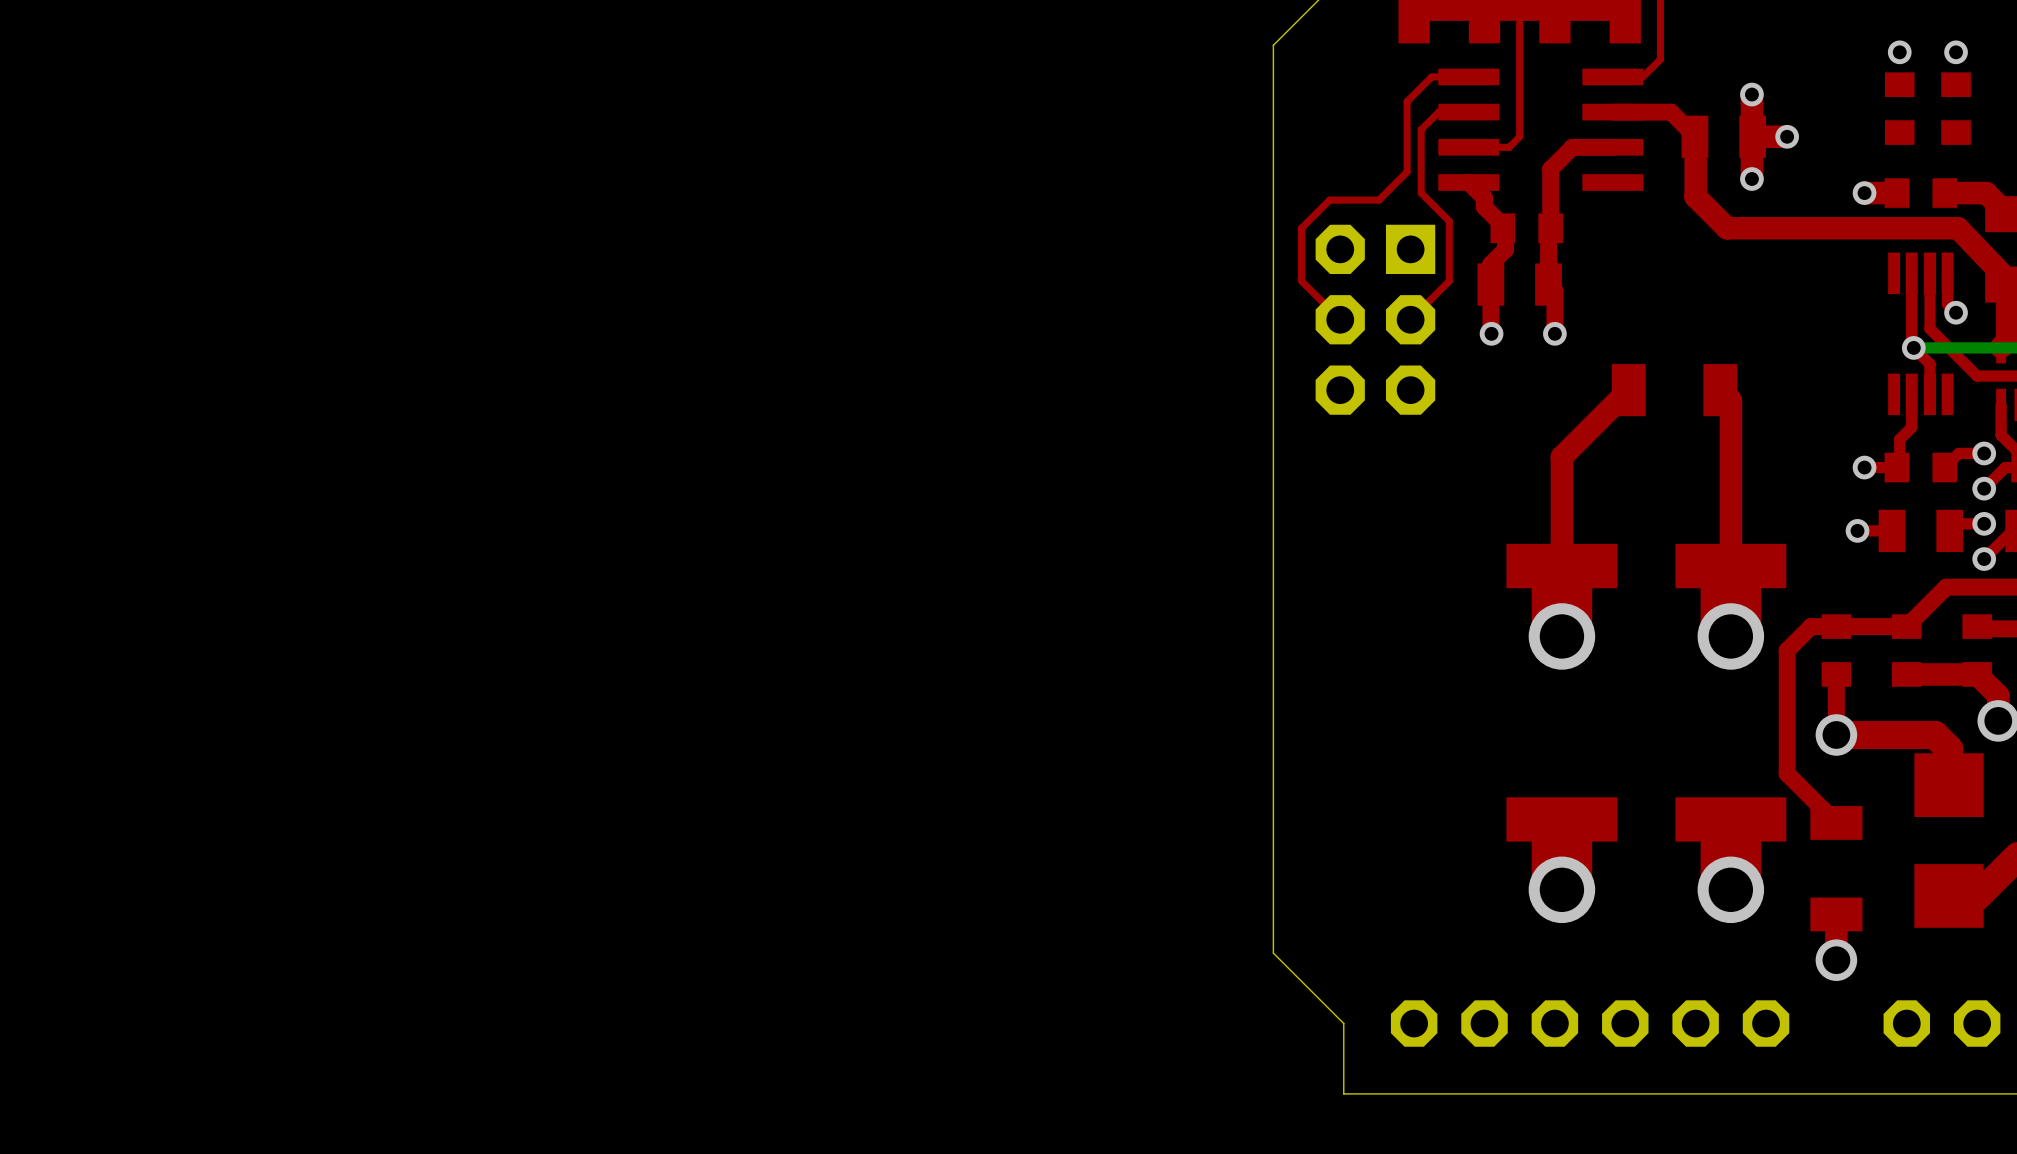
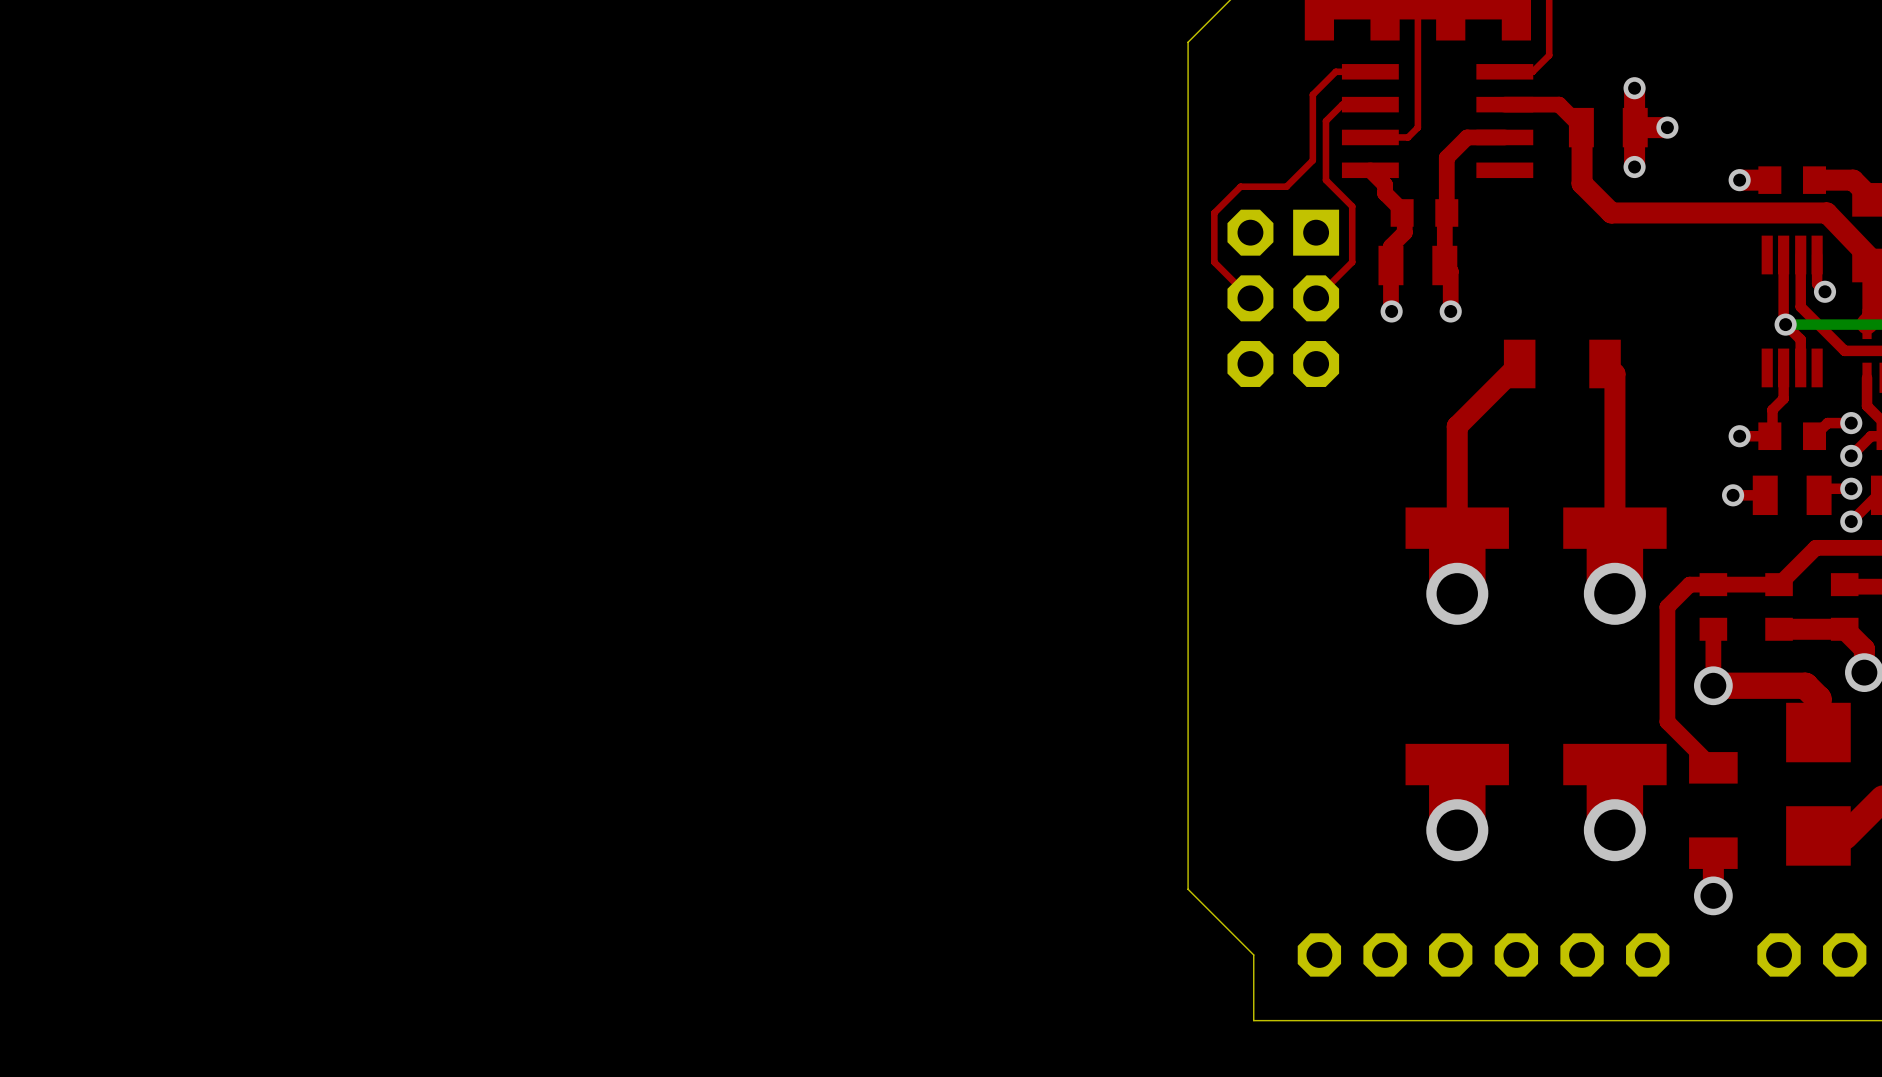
via: (1899, 52) -> none
via: (1956, 52) -> none
part: (1899, 108) -> none
part: (1956, 108) -> none

